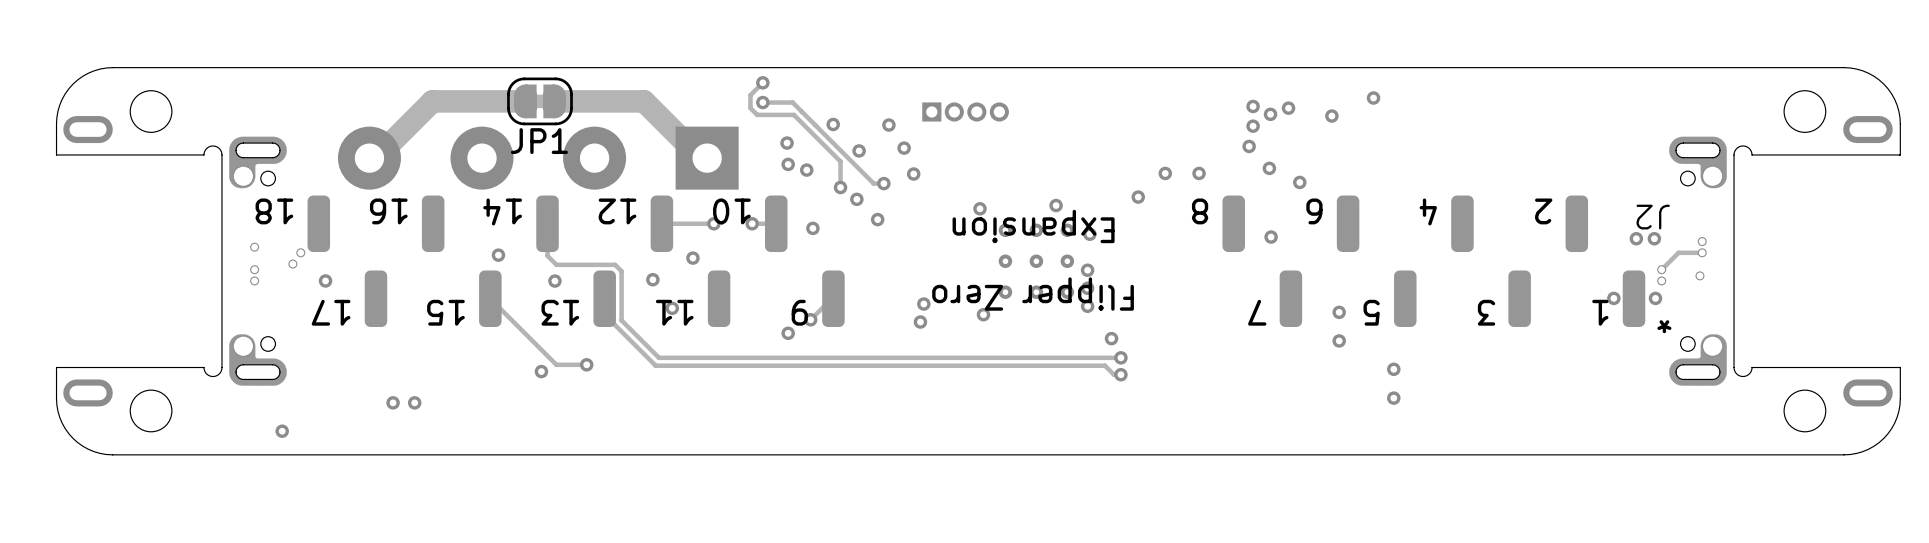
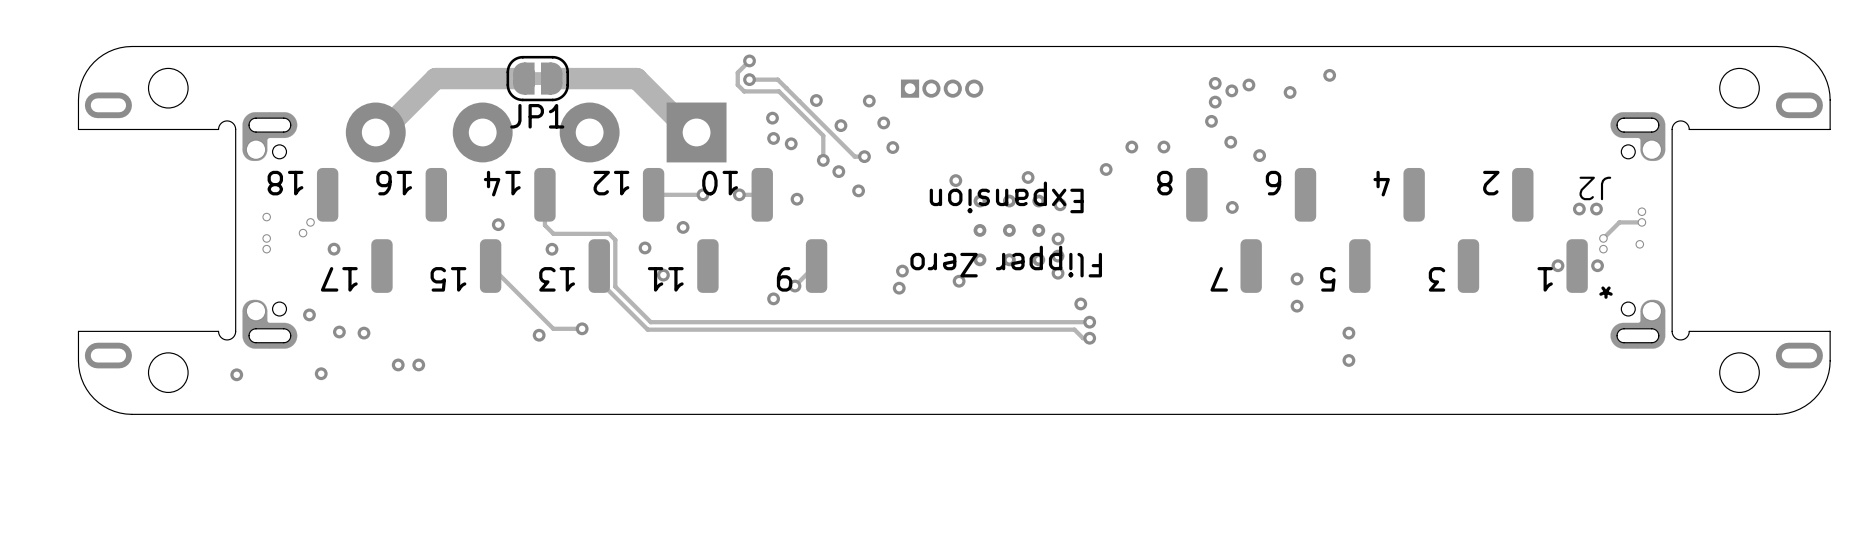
via: none -> (309, 314)
via: none -> (339, 332)
via: none -> (364, 333)
via: none -> (321, 373)
via: none -> (236, 374)
via: (282, 431) -> none

